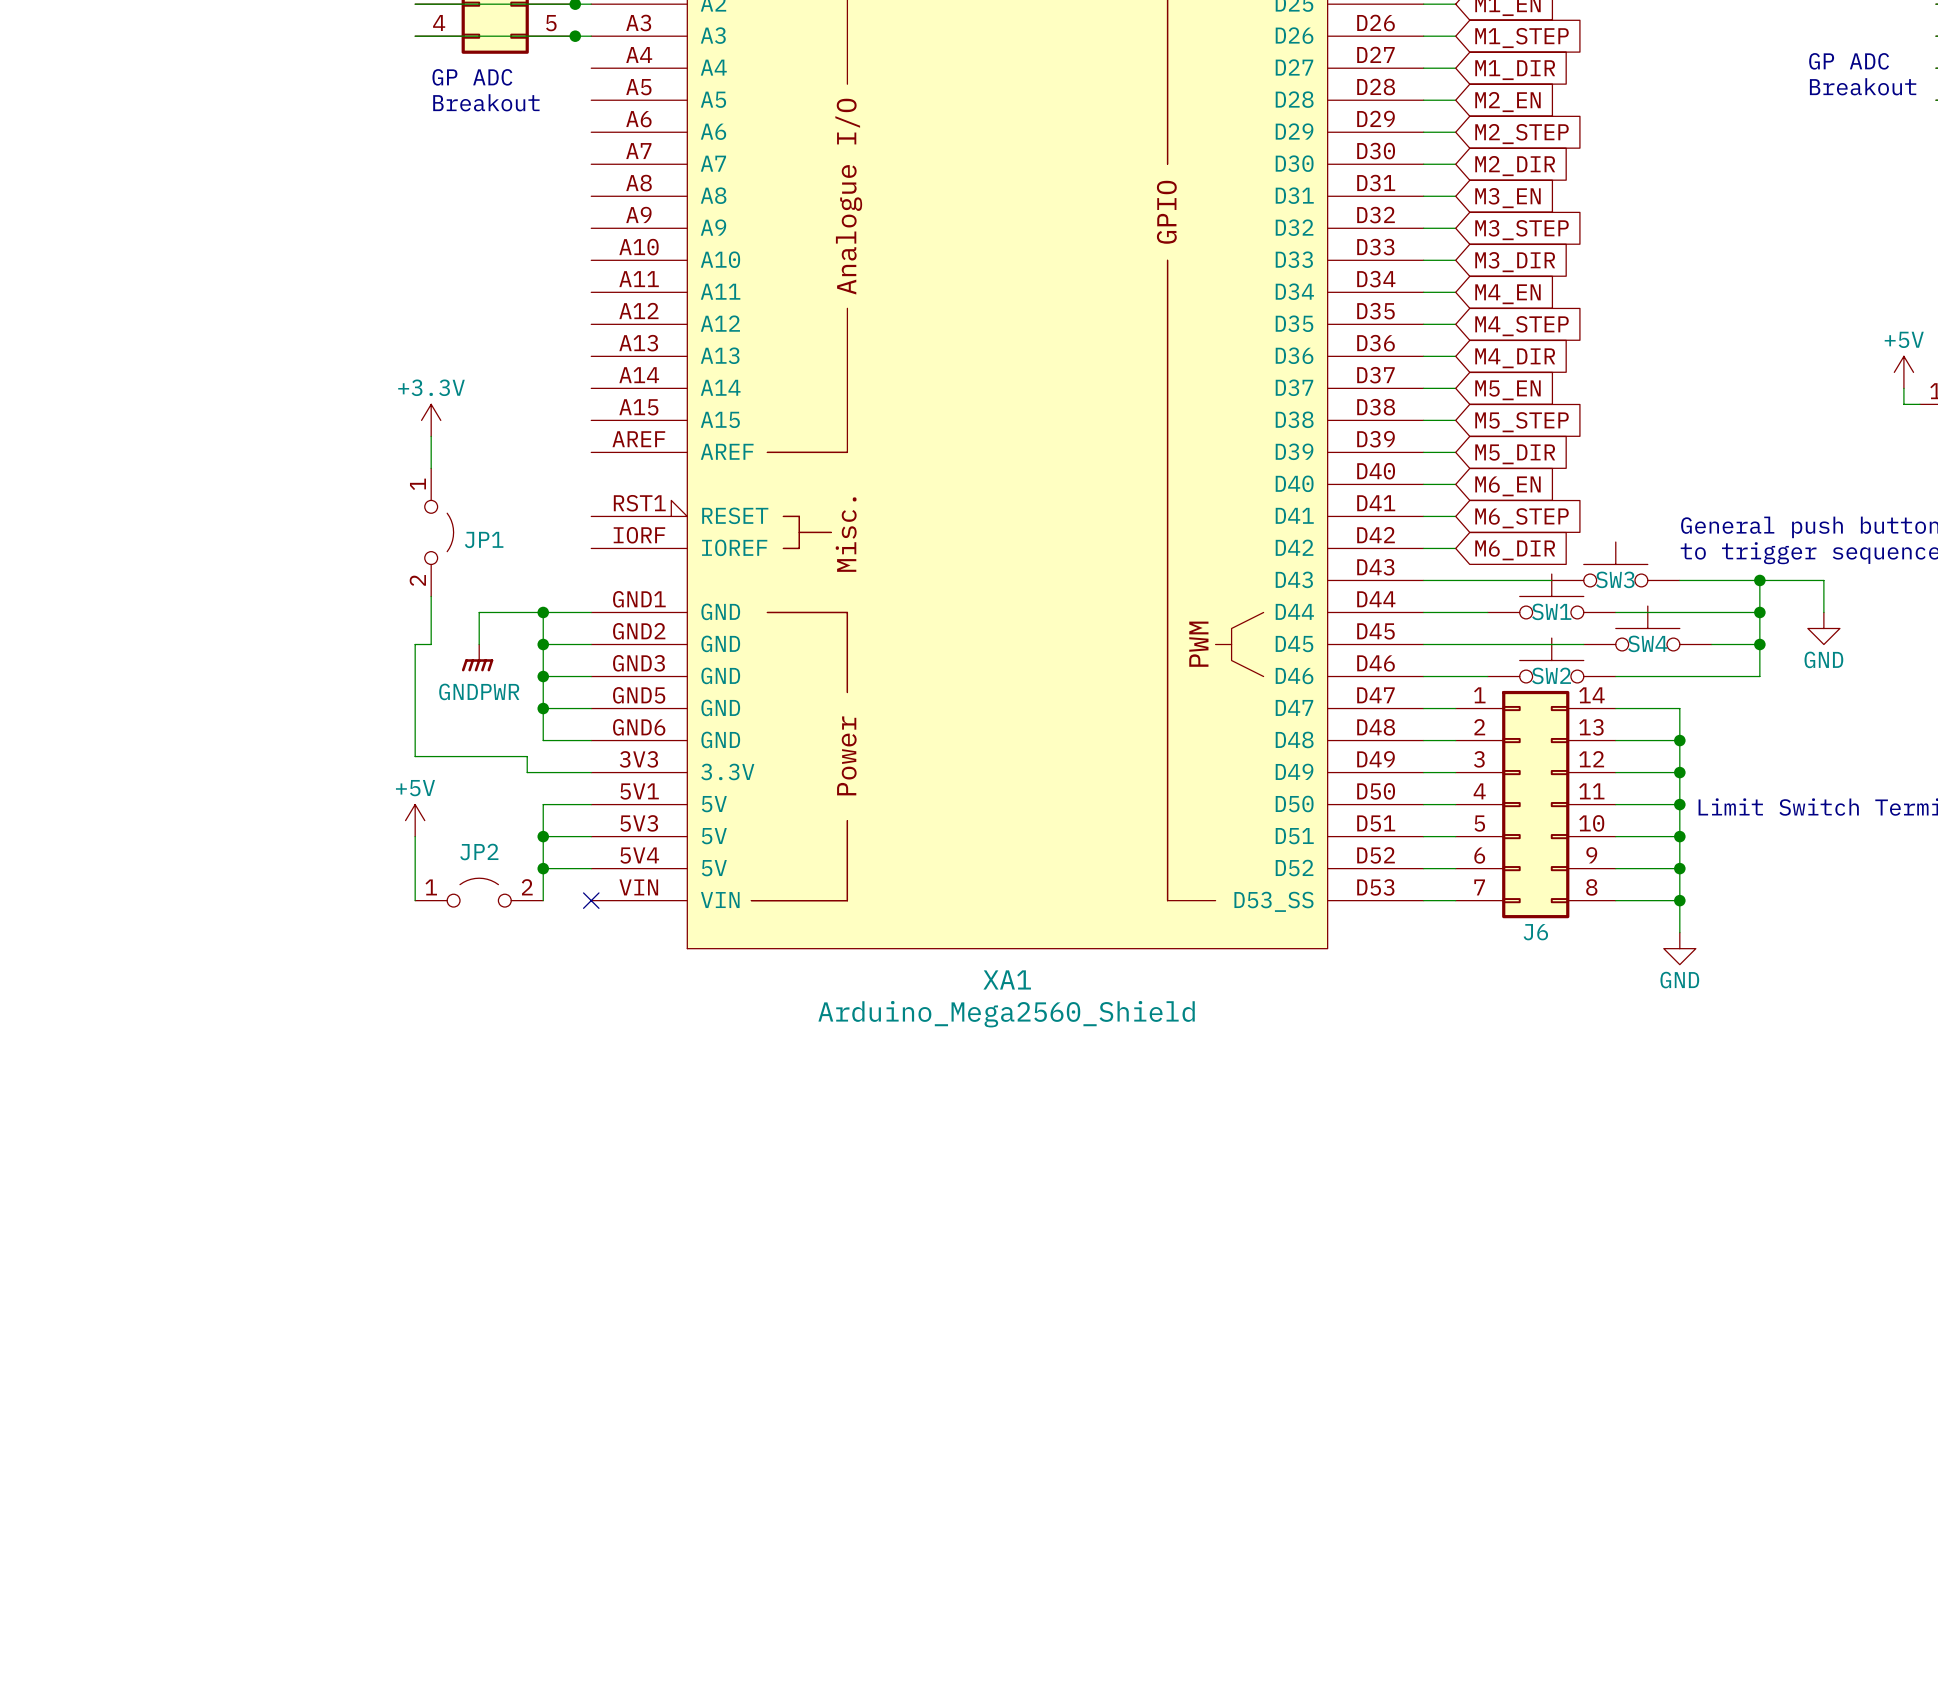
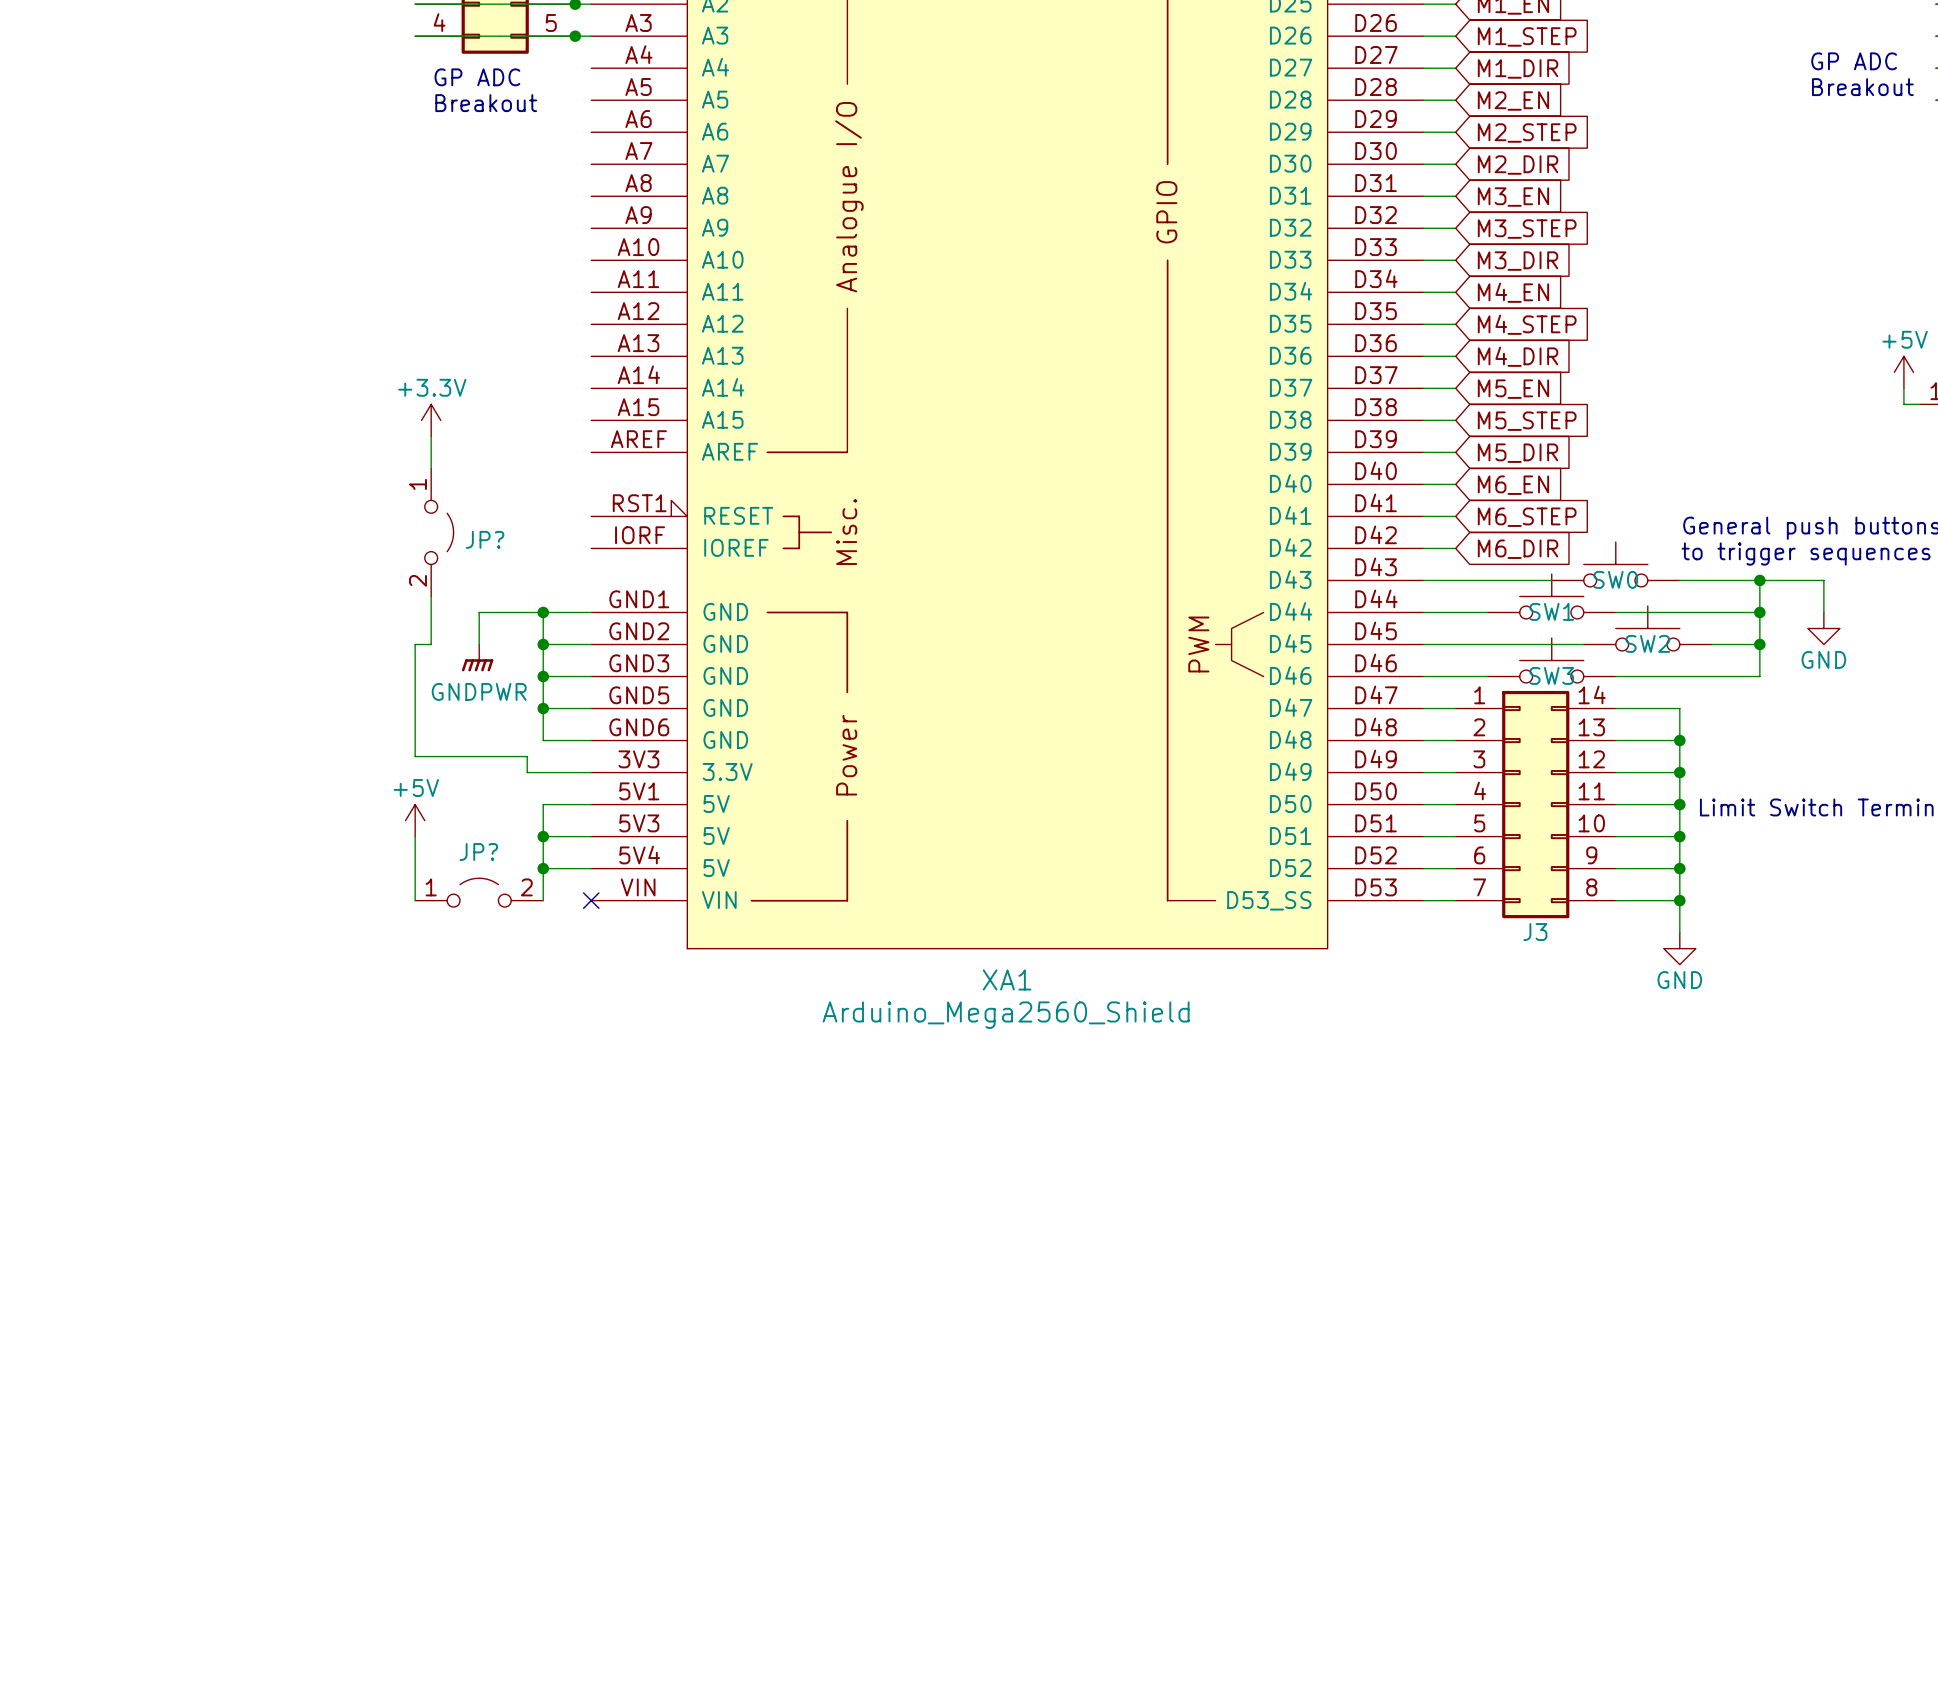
JP1 name: JP1 (484, 539) -> JP? (485, 539)
SW3 name: SW3 (1615, 579) -> SW0 (1615, 579)
SW4 name: SW4 (1647, 643) -> SW2 (1647, 643)
SW2 name: SW2 (1551, 675) -> SW3 (1551, 675)
JP2 name: JP2 (479, 852) -> JP? (478, 852)
J6 name: J6 (1535, 932) -> J3 (1535, 932)

